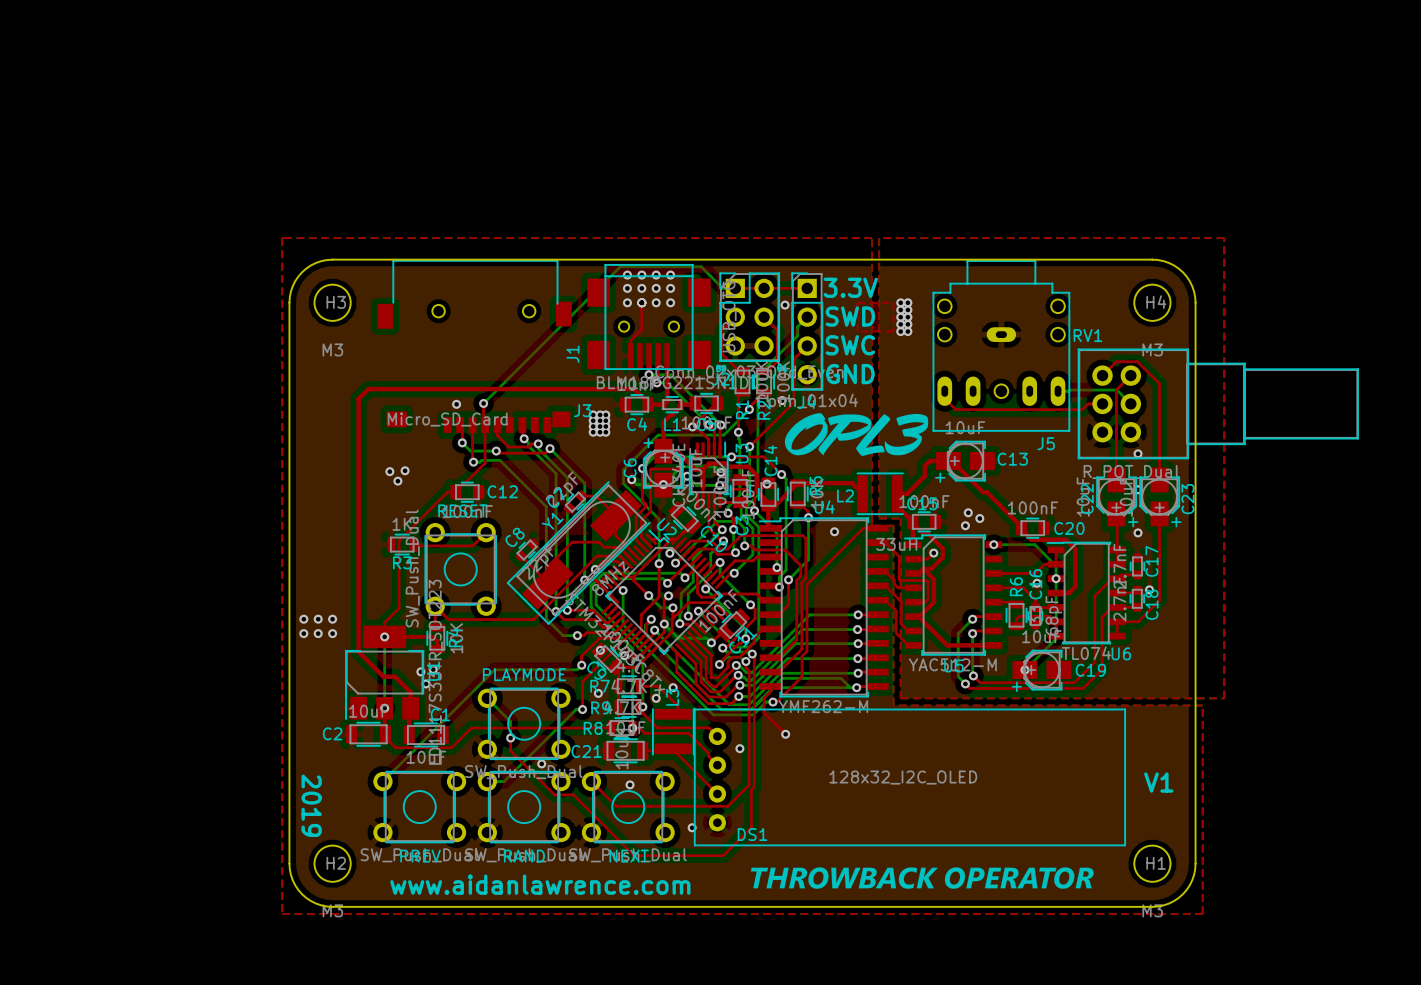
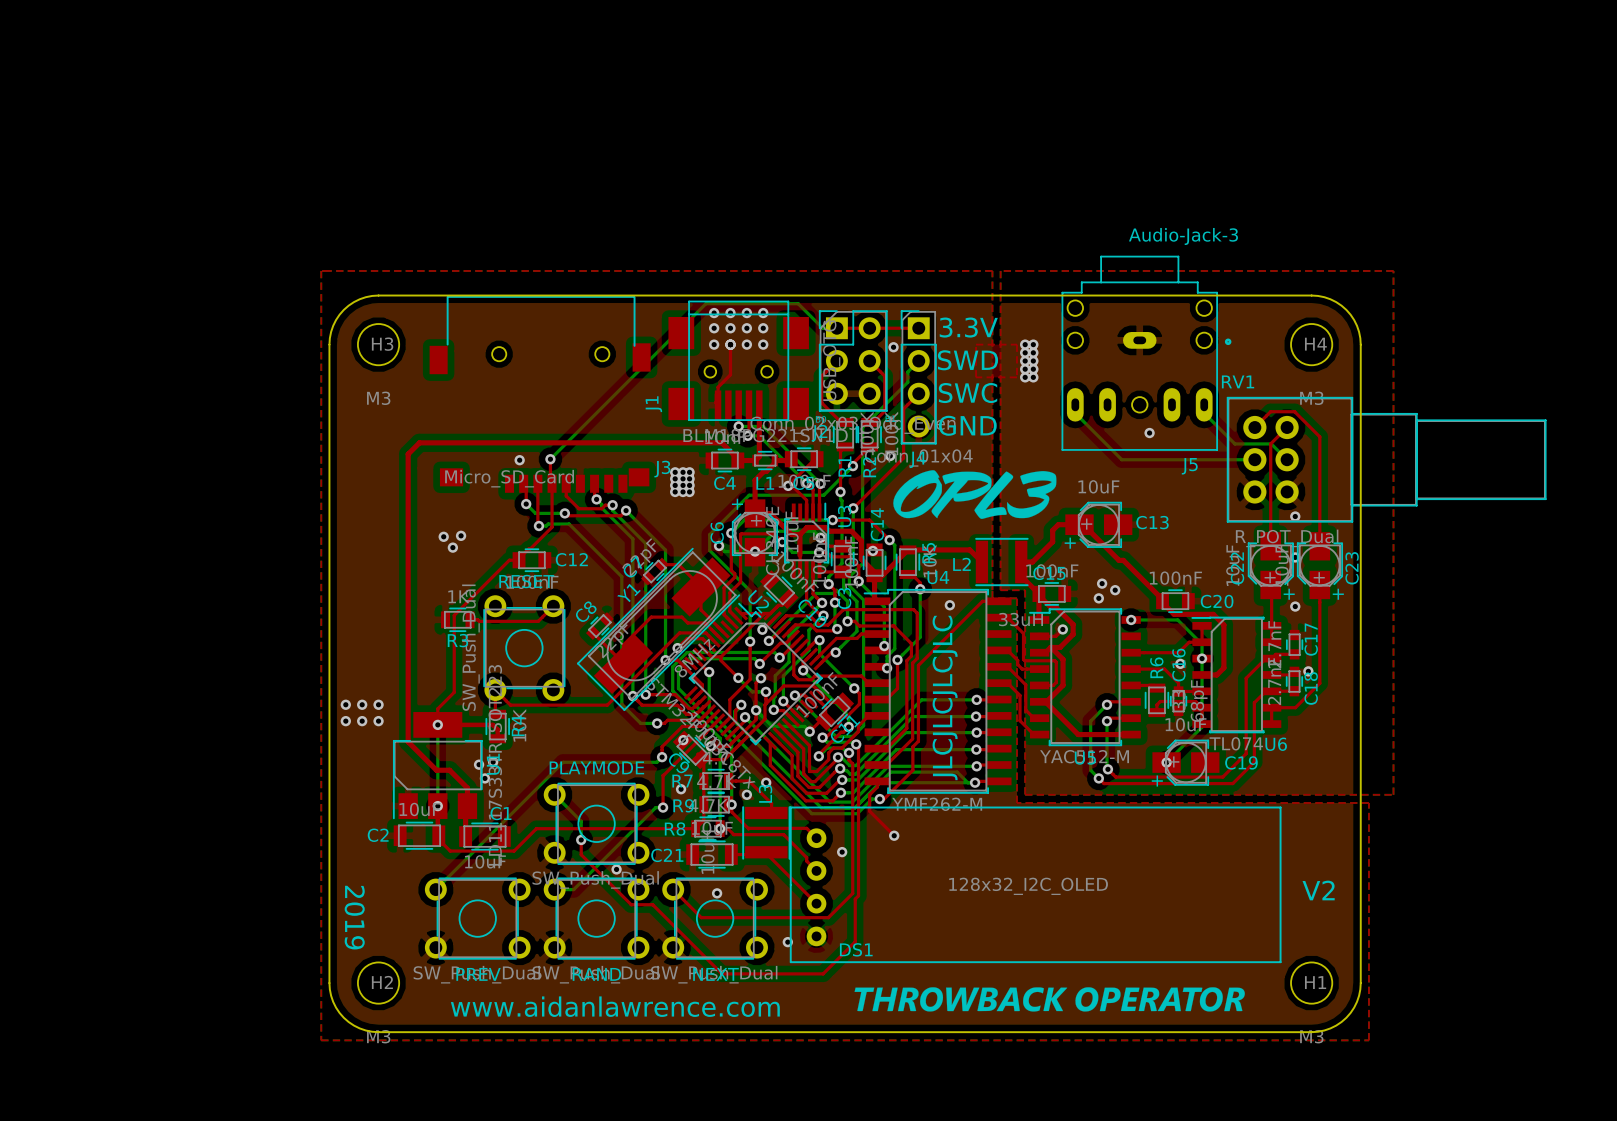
J5 value: none -> Audio-Jack-3 (1183, 236)
J5 footprint: [932, 260, 1071, 432] -> [1061, 255, 1232, 451]
bottom track: none -> (1075, 404) (1075, 413) (1121, 459) (1254, 459)
via: none -> (1149, 433)
bottom track: (1085, 390) (1058, 391) -> (1234, 443) (1204, 413) (1204, 404)
top track: (944, 391) (944, 398) (955, 409) (1082, 409) (1088, 403) (1102, 403) -> none
text: none -> JLCJLCJLCJLC (945, 697)
text: V1 (1158, 782) -> V2 (1318, 890)

